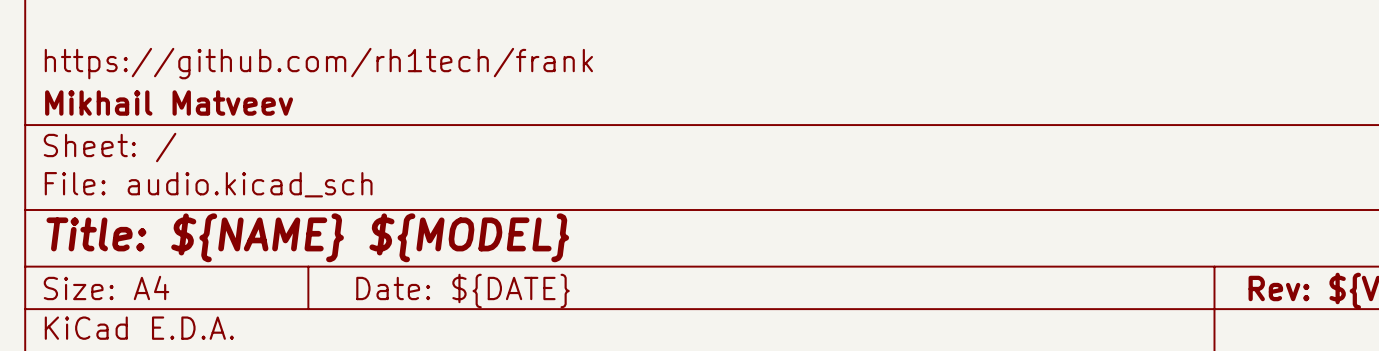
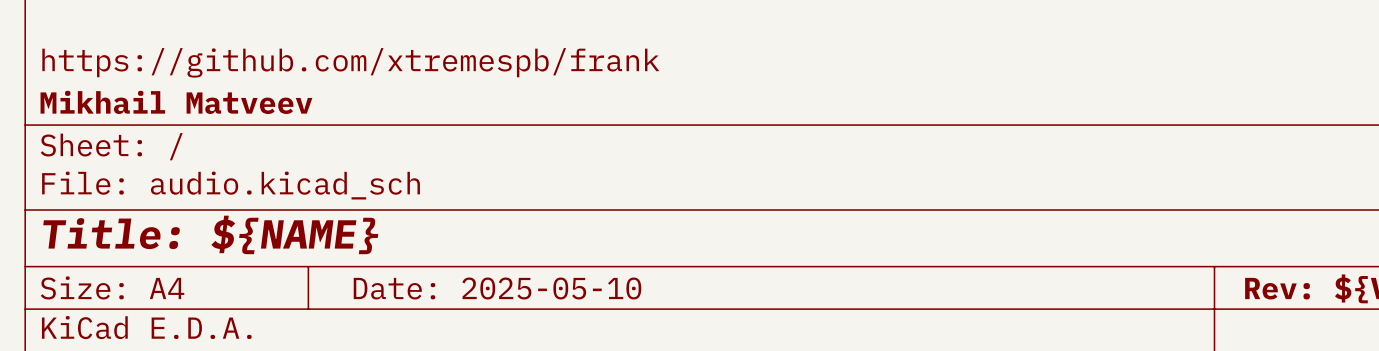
title block: https://github.com/rh1tech/frank (318, 63) -> https://github.com/xtremespb/frank (350, 62)
title block: Title: ${NAME} ${MODEL} (307, 237) -> Title: ${NAME} (210, 234)
title block: Date: ${DATE} (462, 291) -> Date: 2025-05-10 (497, 288)

